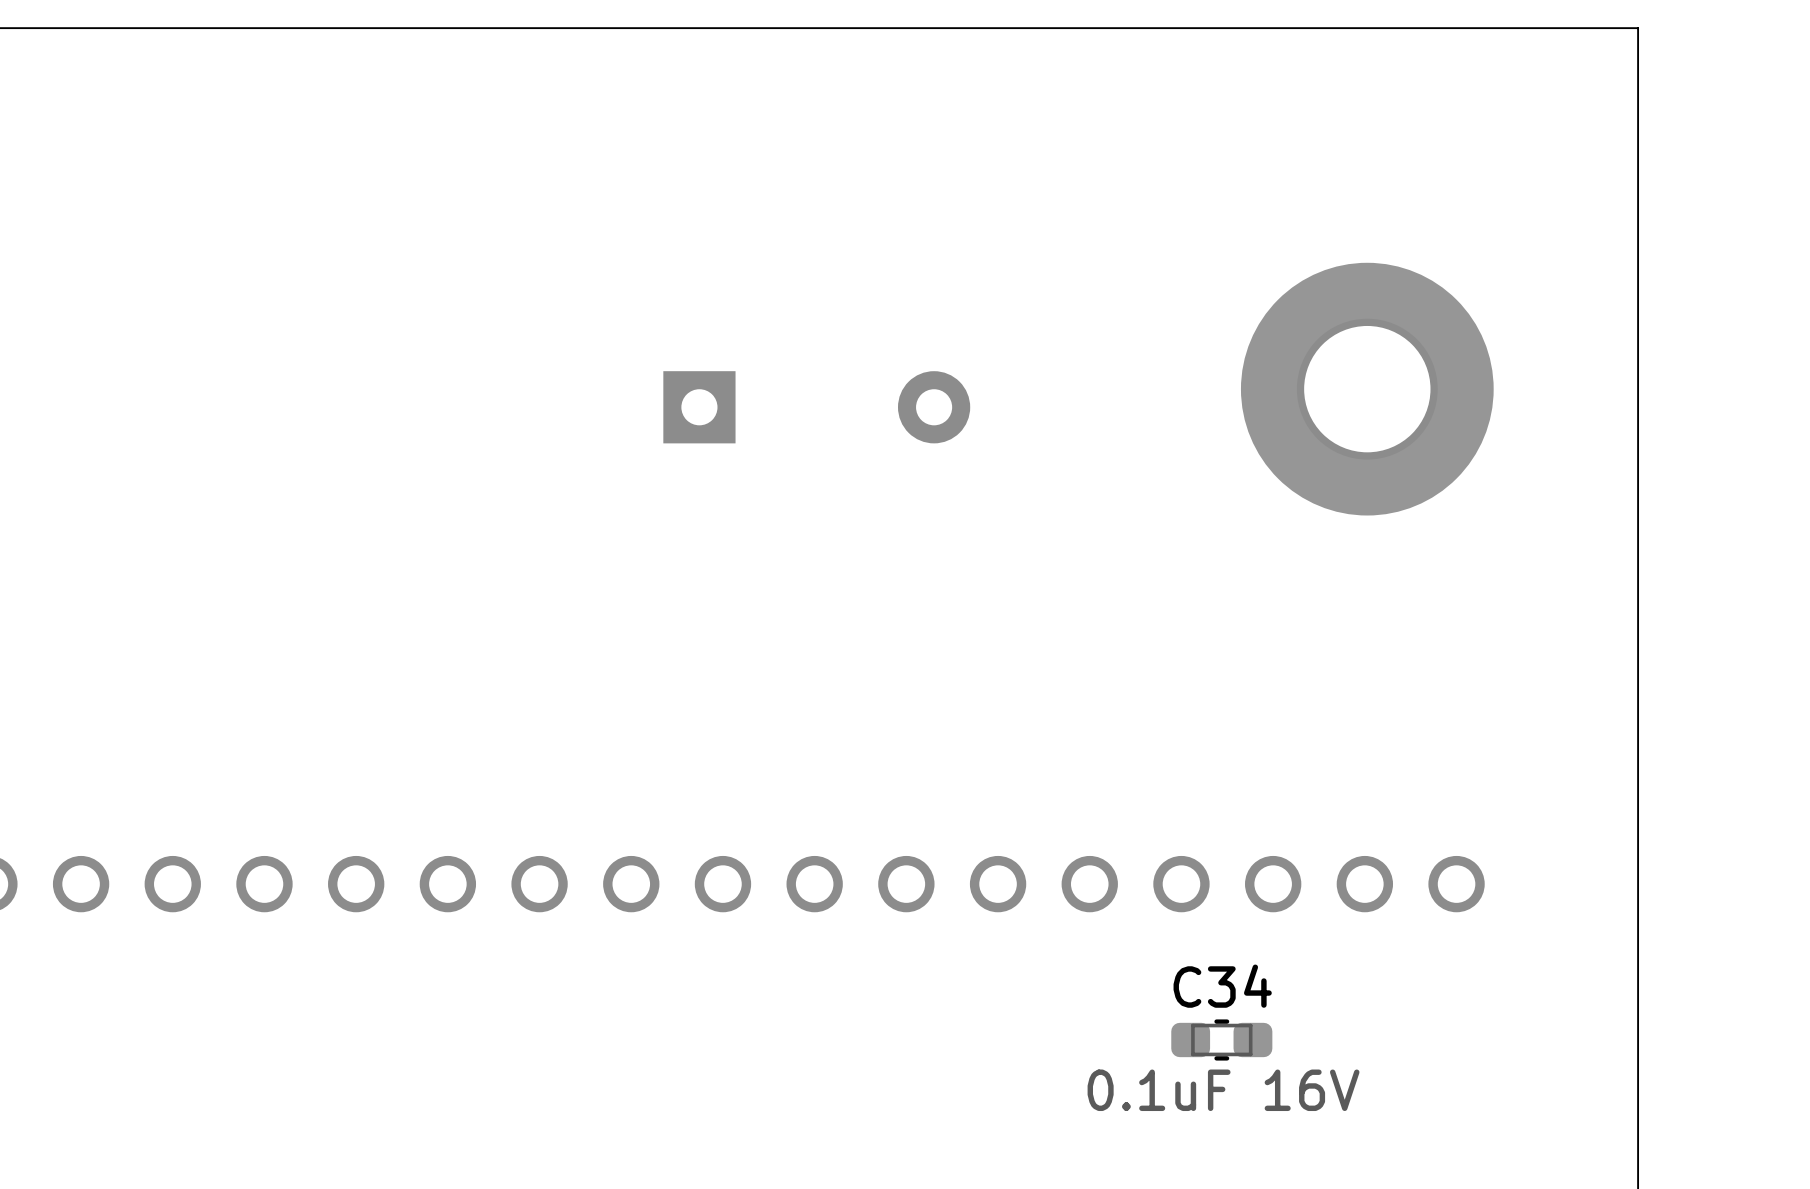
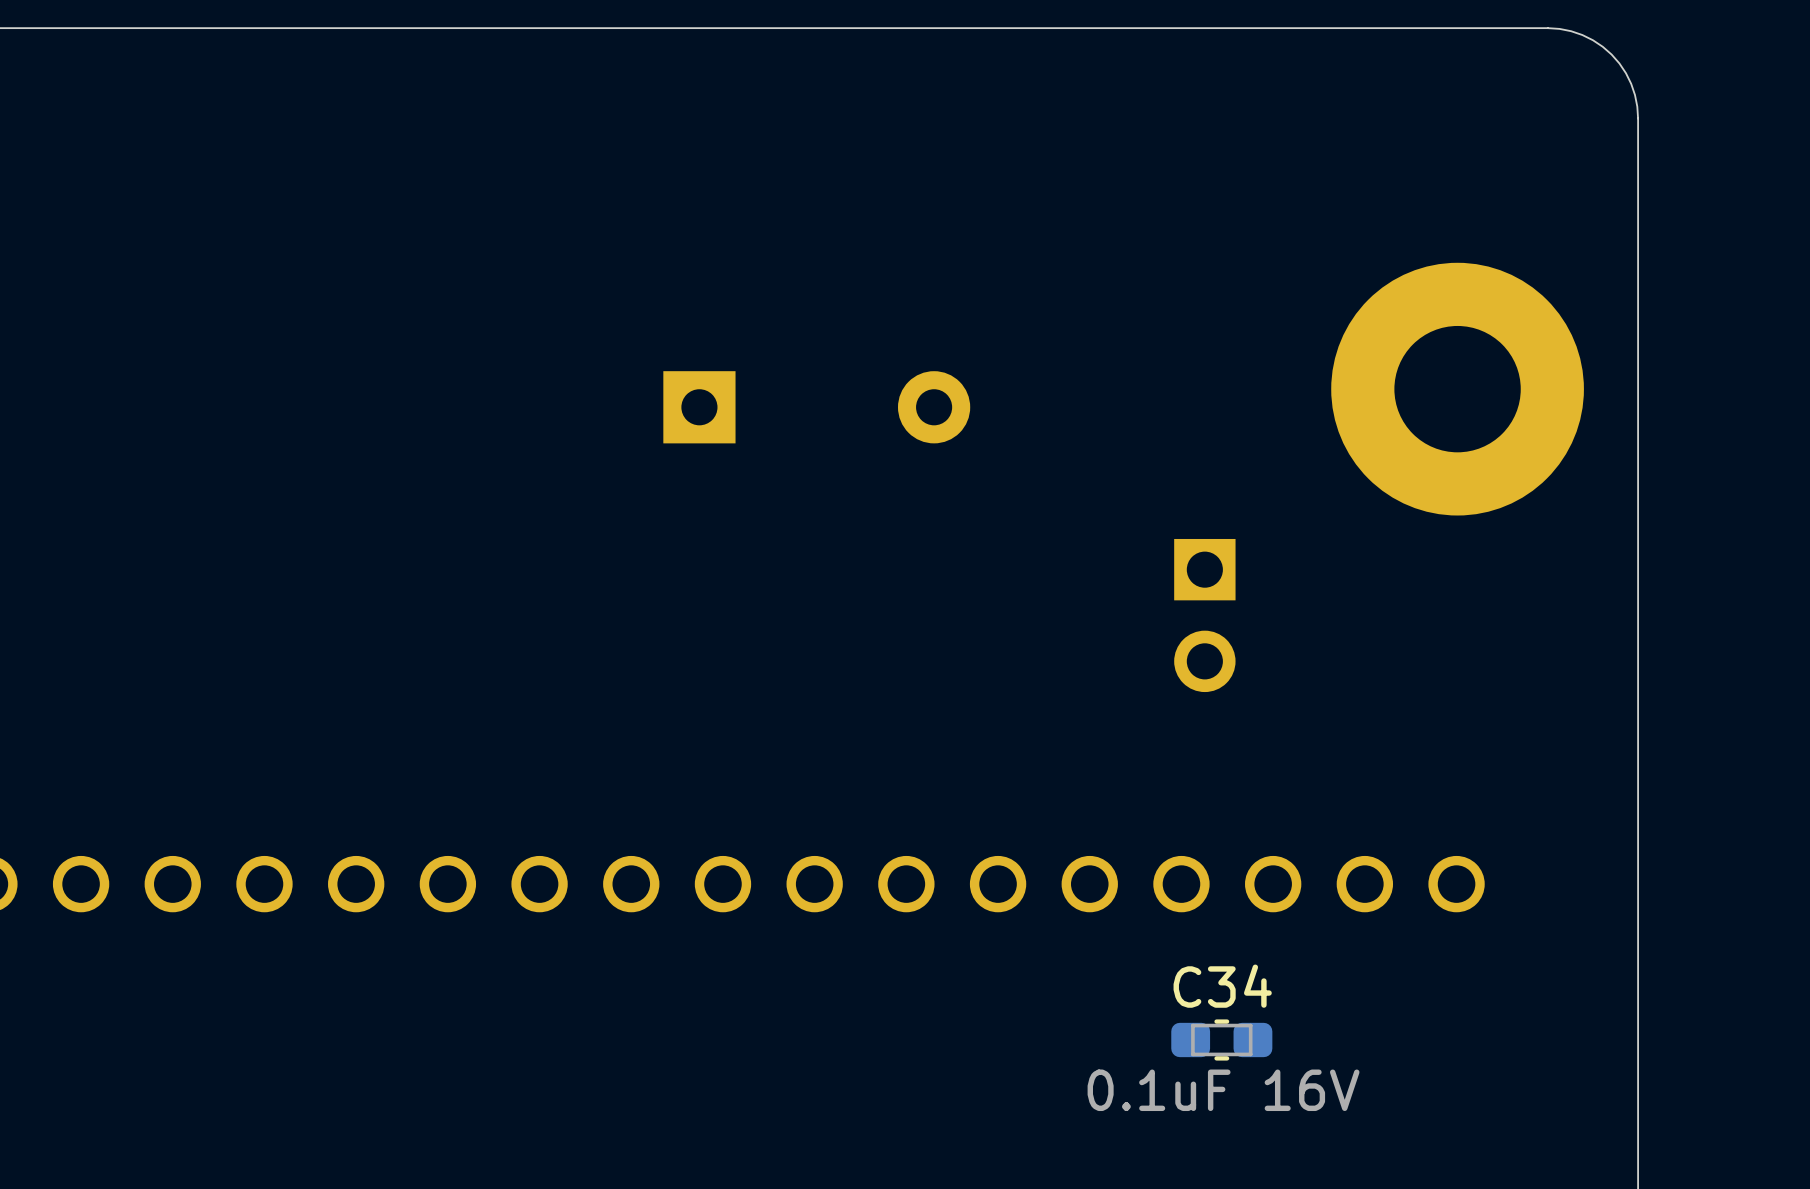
board edge: (1547, 28) (1638, 28) (1638, 118) -> (1547, 28) (1571, 31) (1582, 35) (1592, 40) (1611, 54) (1625, 73) (1631, 83) (1635, 95) (1638, 118)
part: (1367, 389) -> none
part: none -> (1457, 389)
part: none -> (1204, 615)

